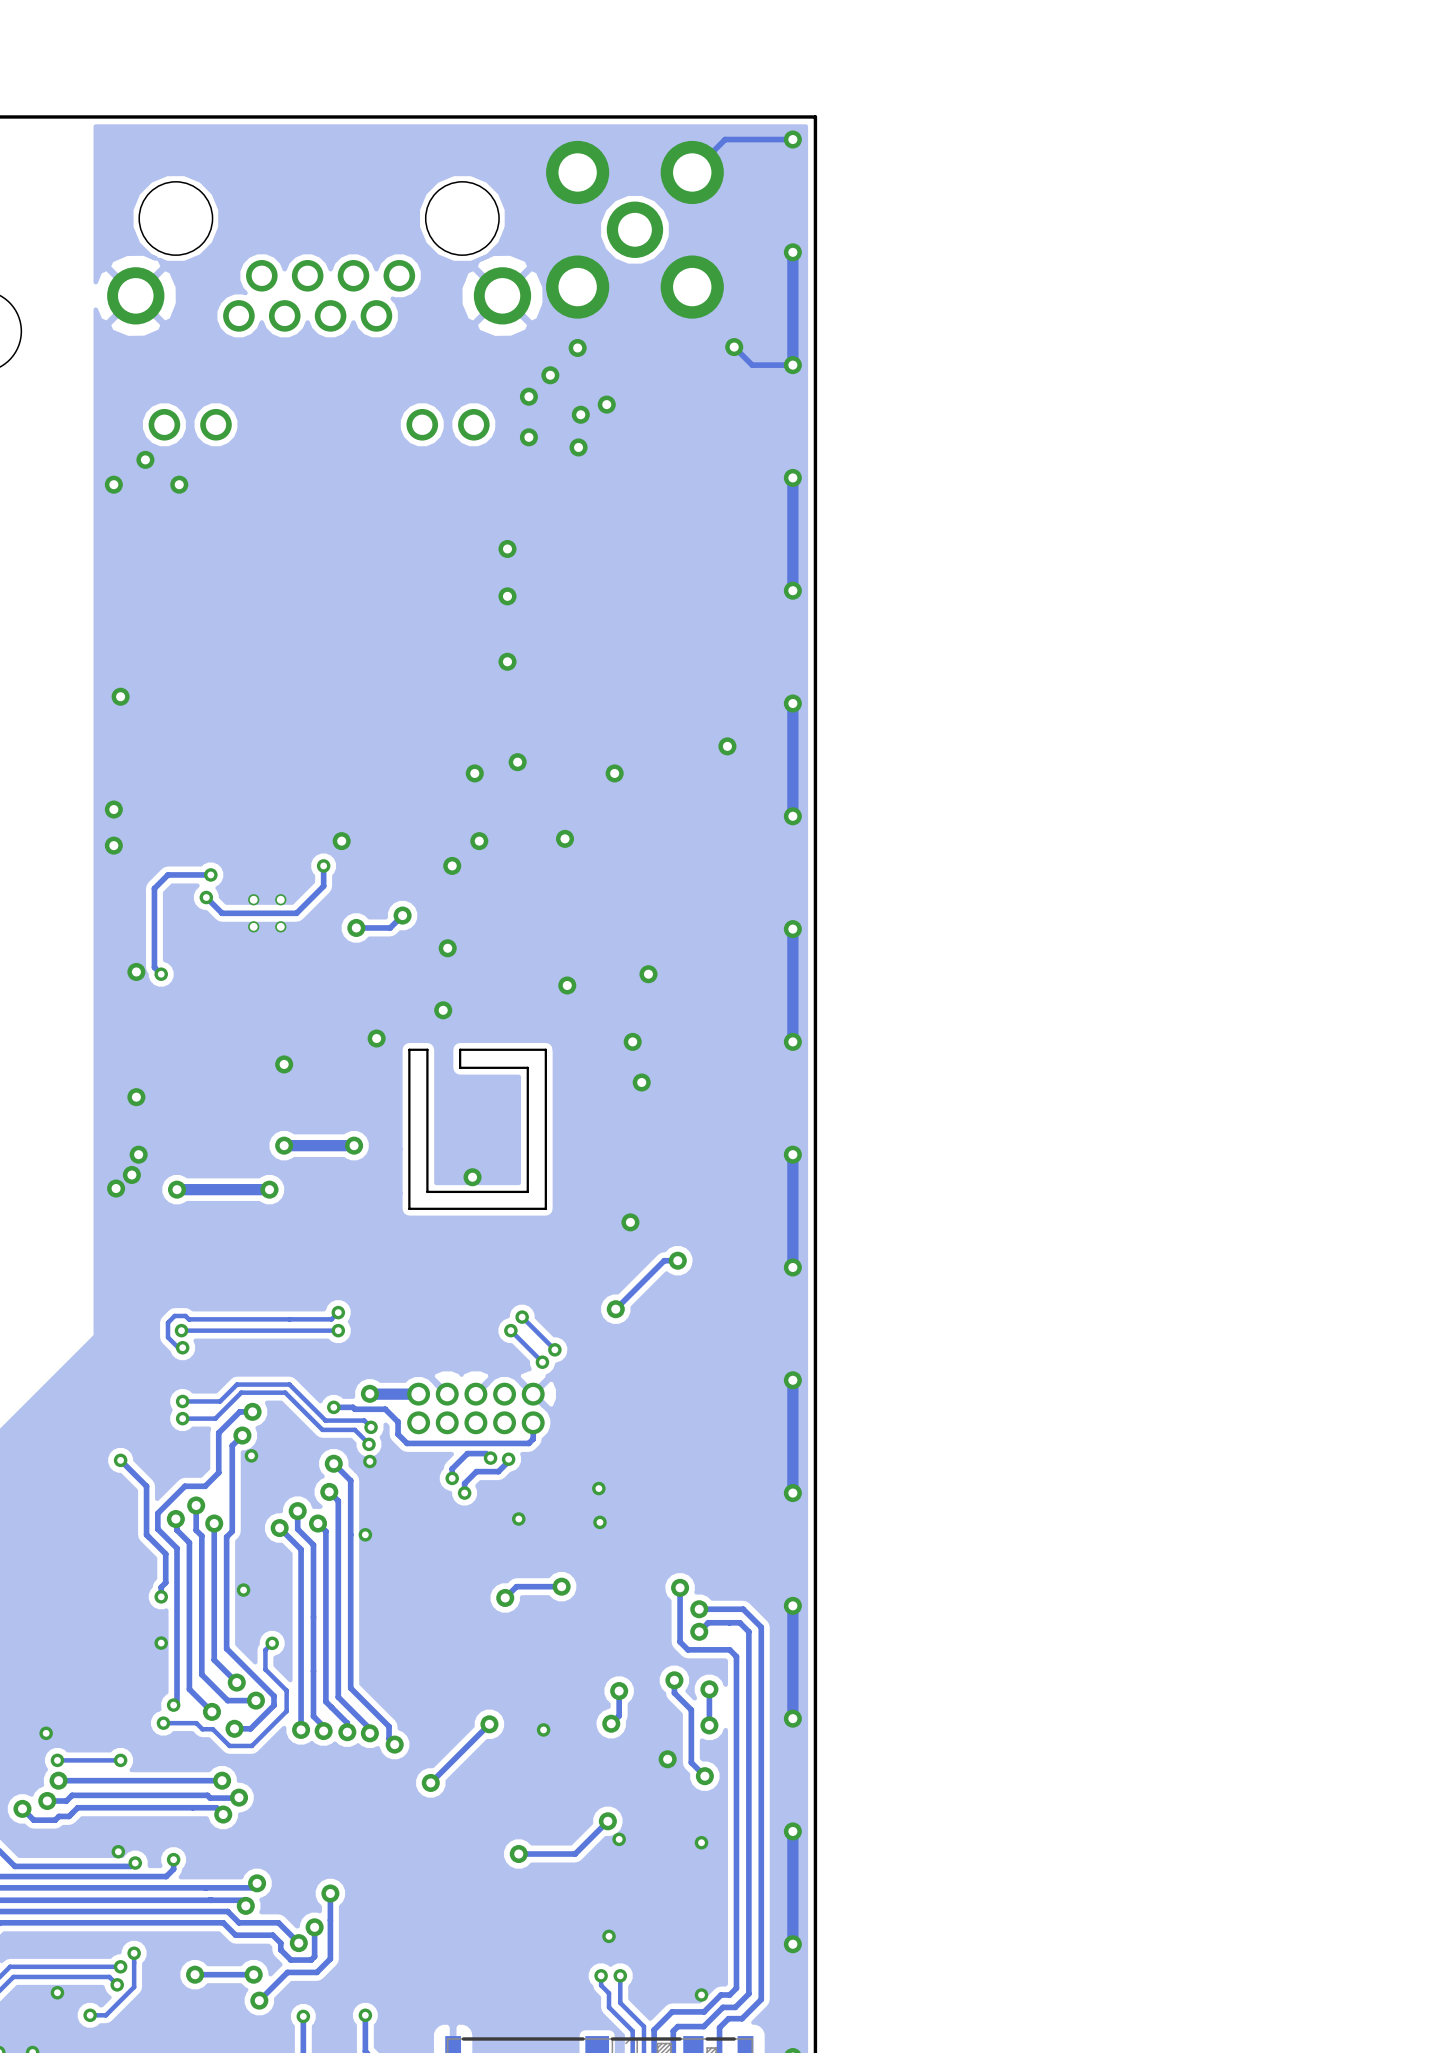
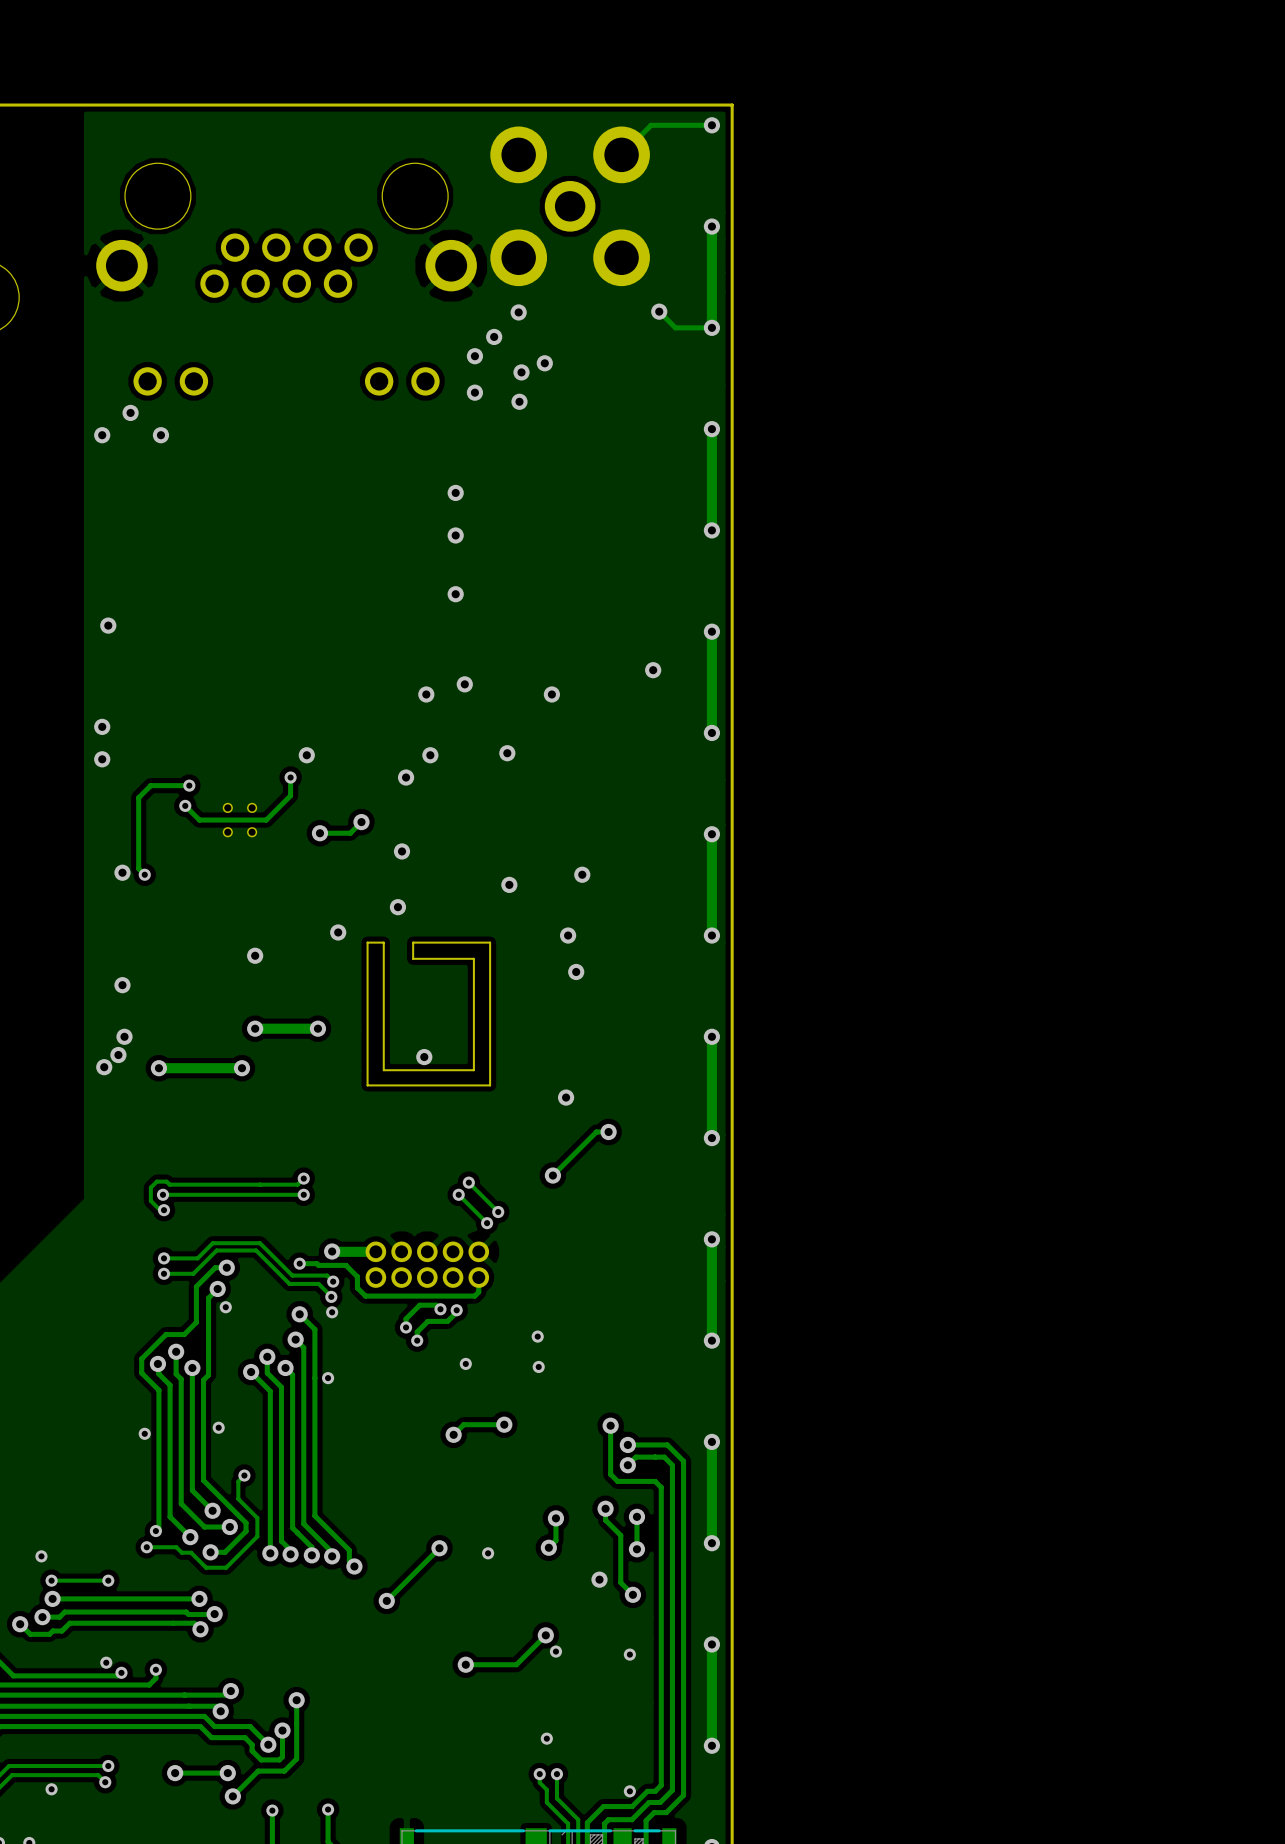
track: (120, 1460) (146, 1486) (146, 1534) (165, 1553) (165, 1582) (161, 1587) (161, 1596) -> none
via: (120, 1460) -> none
via: (161, 1643) -> none
track: (134, 1953) (134, 1987) (105, 2015) (90, 2015) -> none
via: (134, 1953) -> none
via: (90, 2015) -> none

